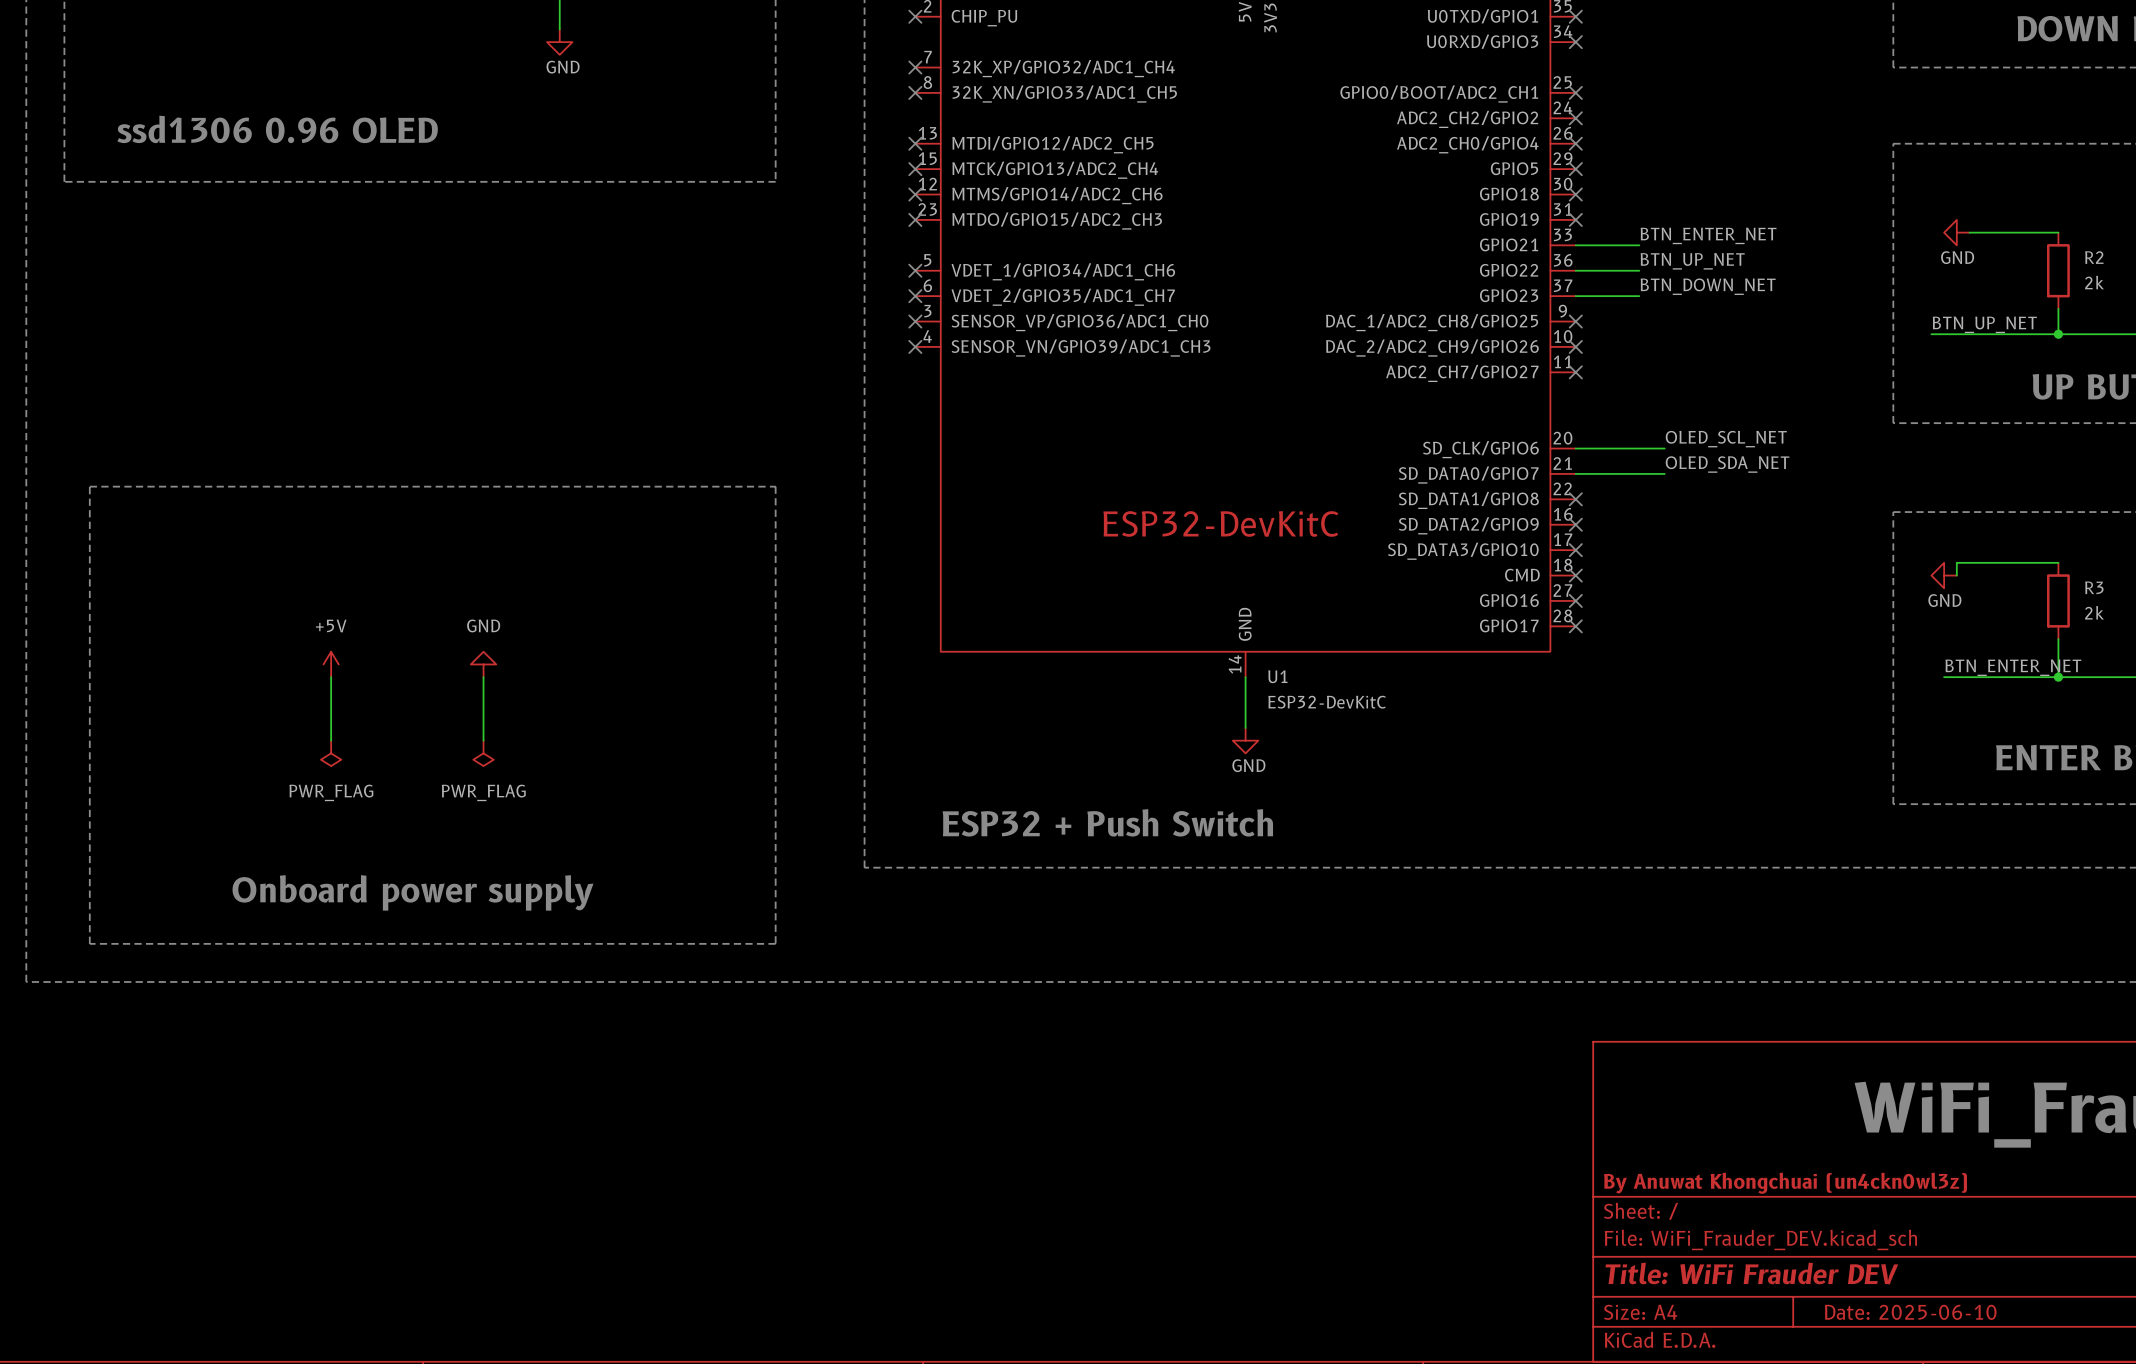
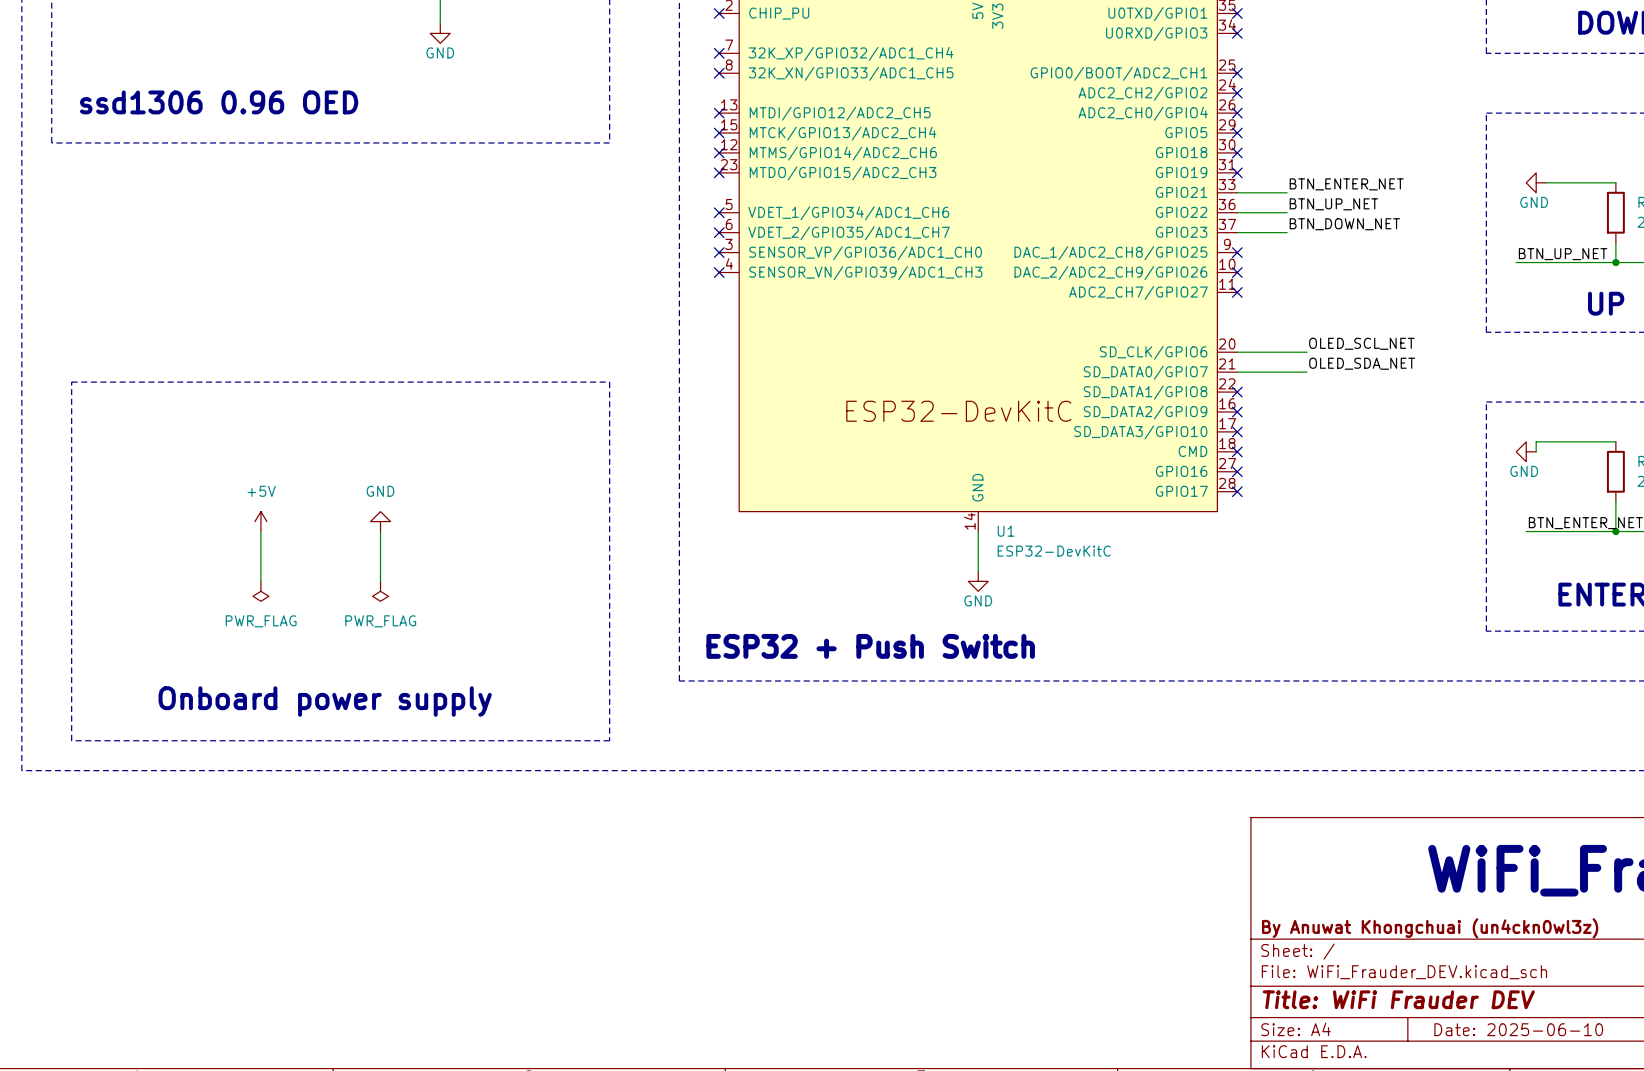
text: ssd1306 0.96 OLED (277, 129) -> ssd1306 0.96 OED (219, 102)

